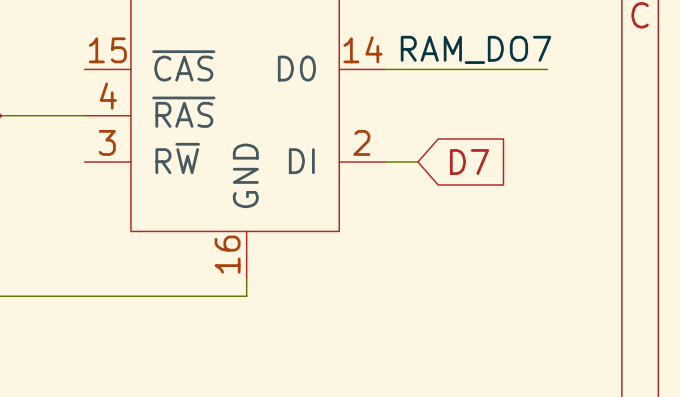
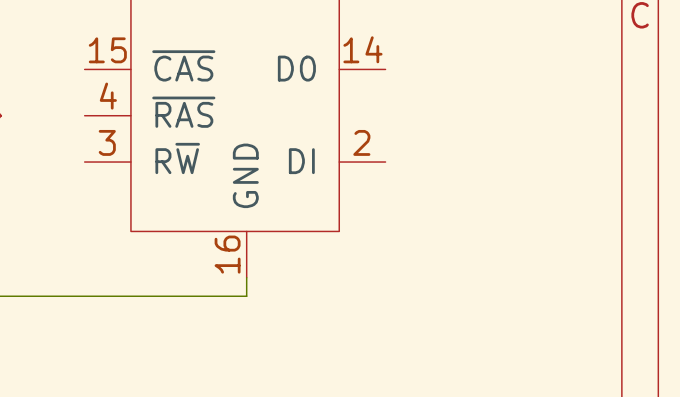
label: RAM_DO7 (475, 49) -> none
wire: (385, 69) (547, 69) -> none
wire: (1, 115) (84, 115) -> none
wire: (385, 162) (417, 162) -> none
global label: D7 (469, 162) -> none

